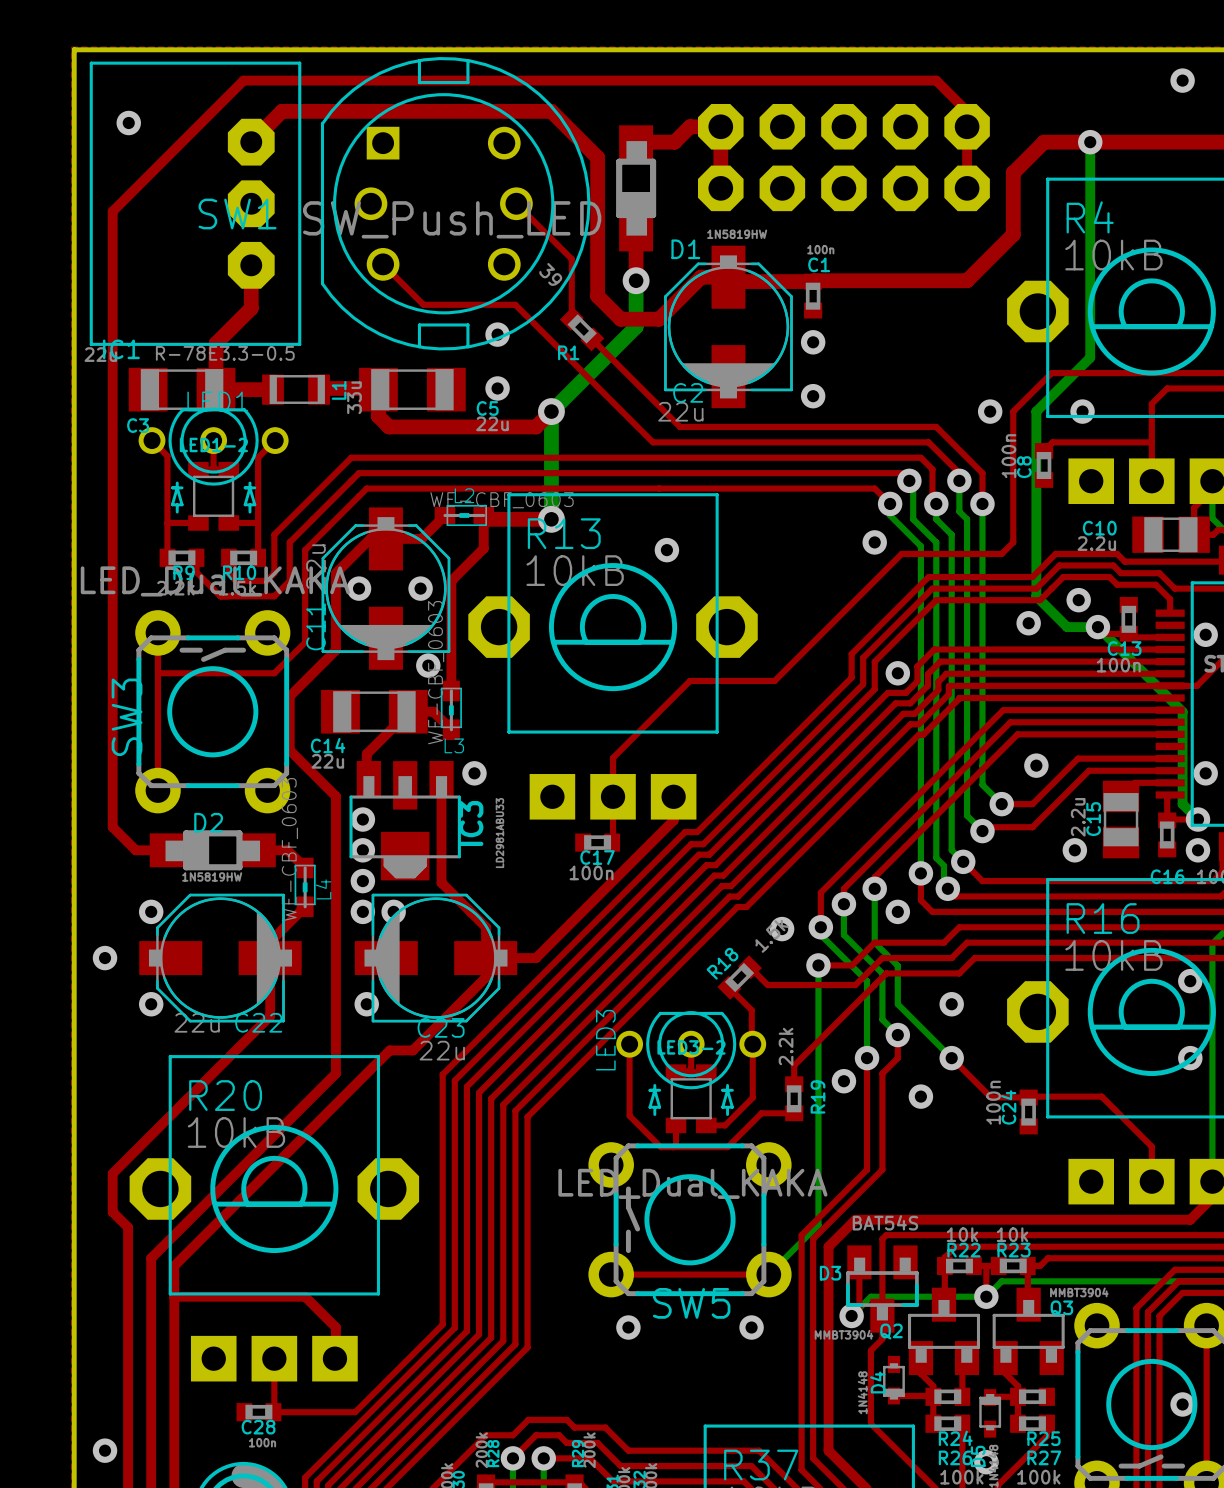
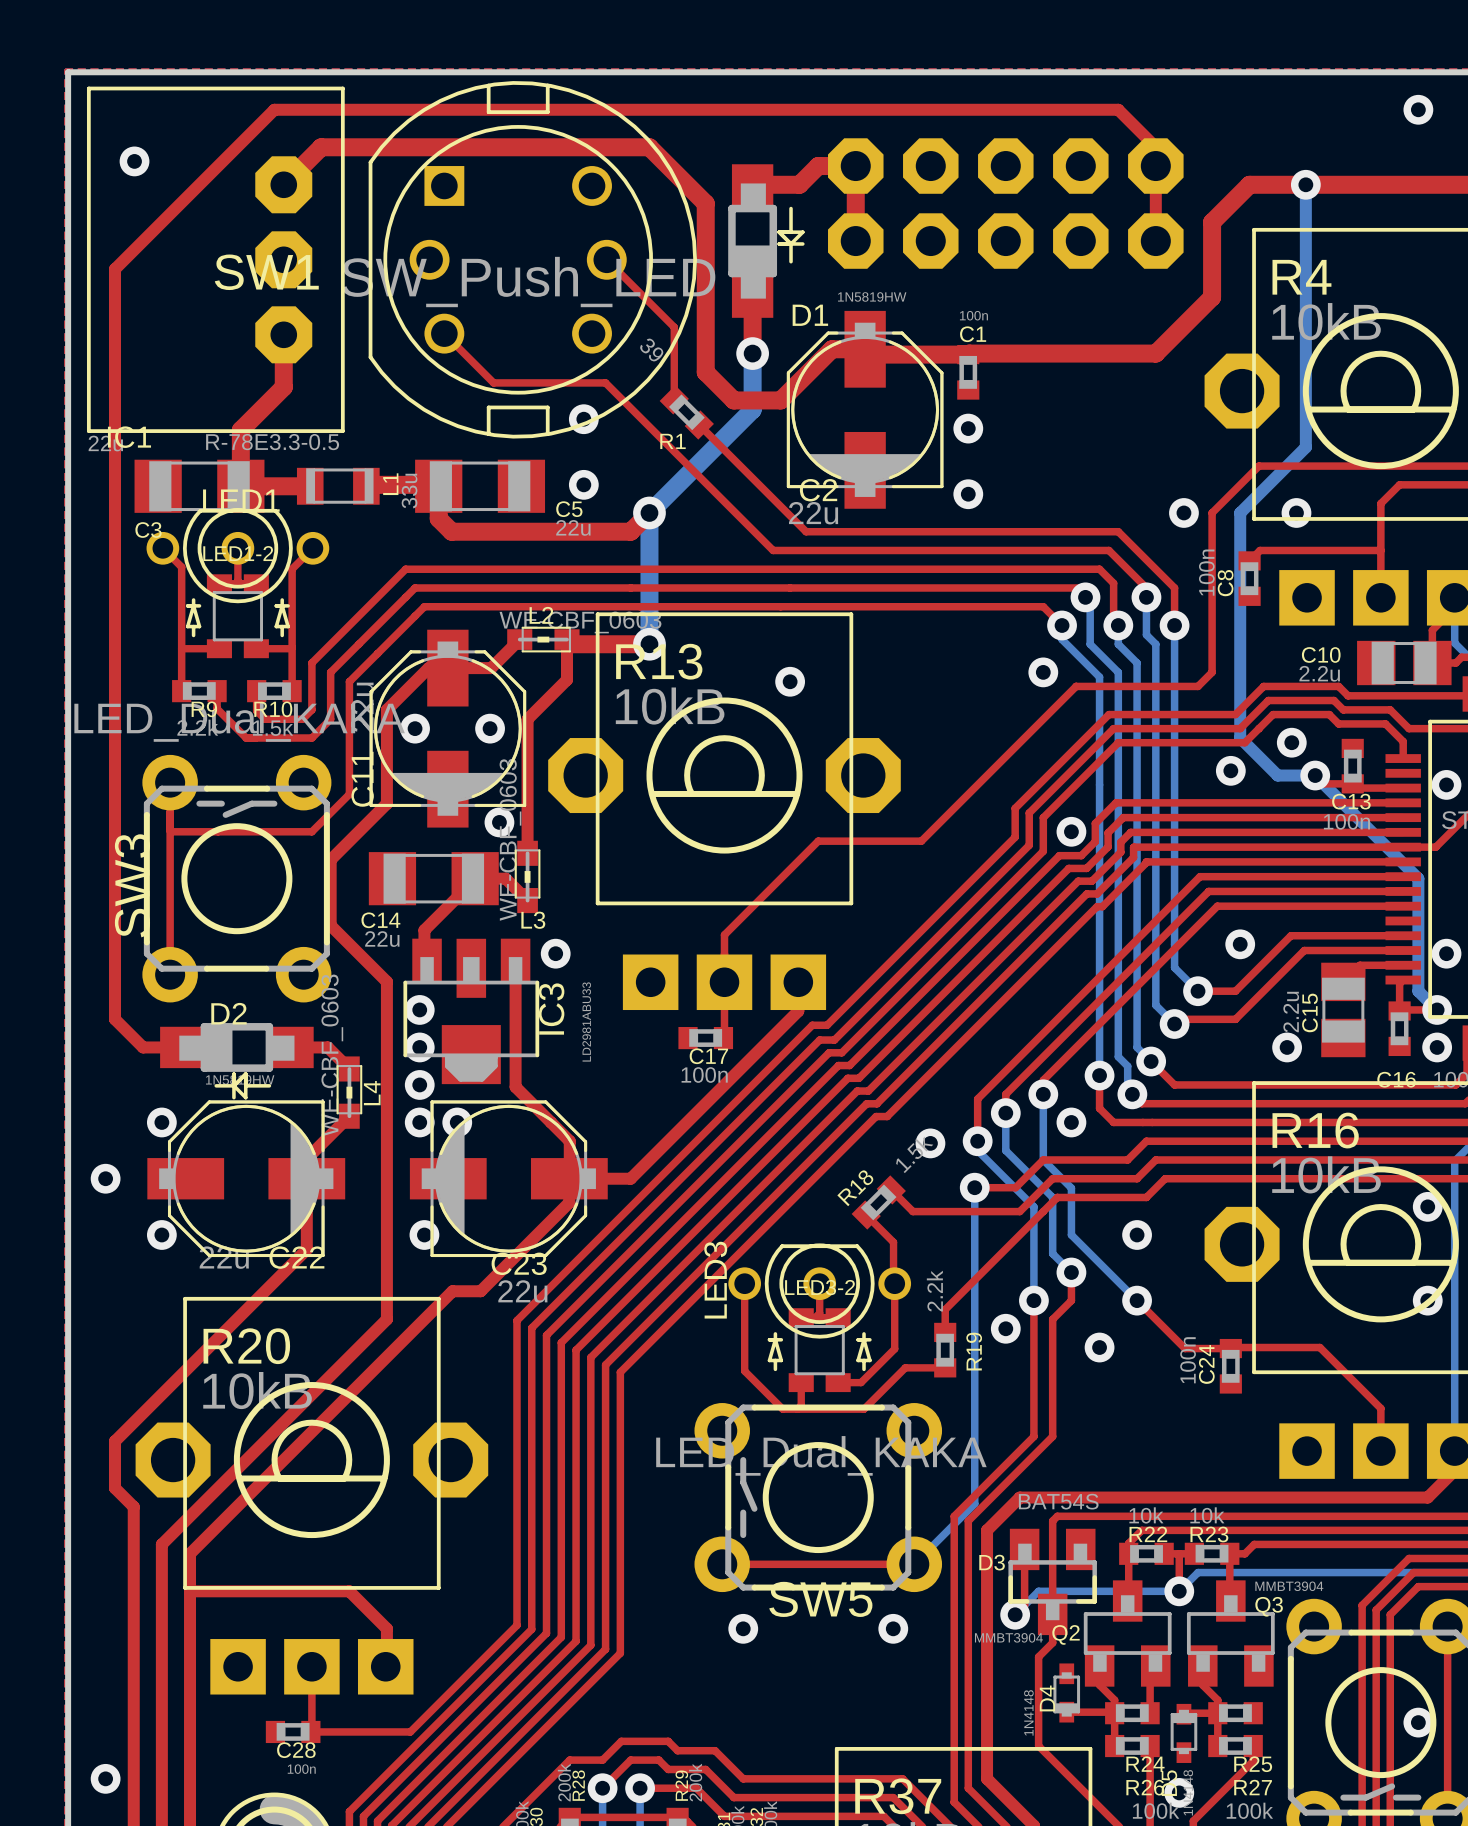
D1 footprint: [616, 125, 657, 252] -> [728, 164, 805, 318]
D2 footprint: [149, 830, 276, 871] -> [160, 1023, 314, 1100]

